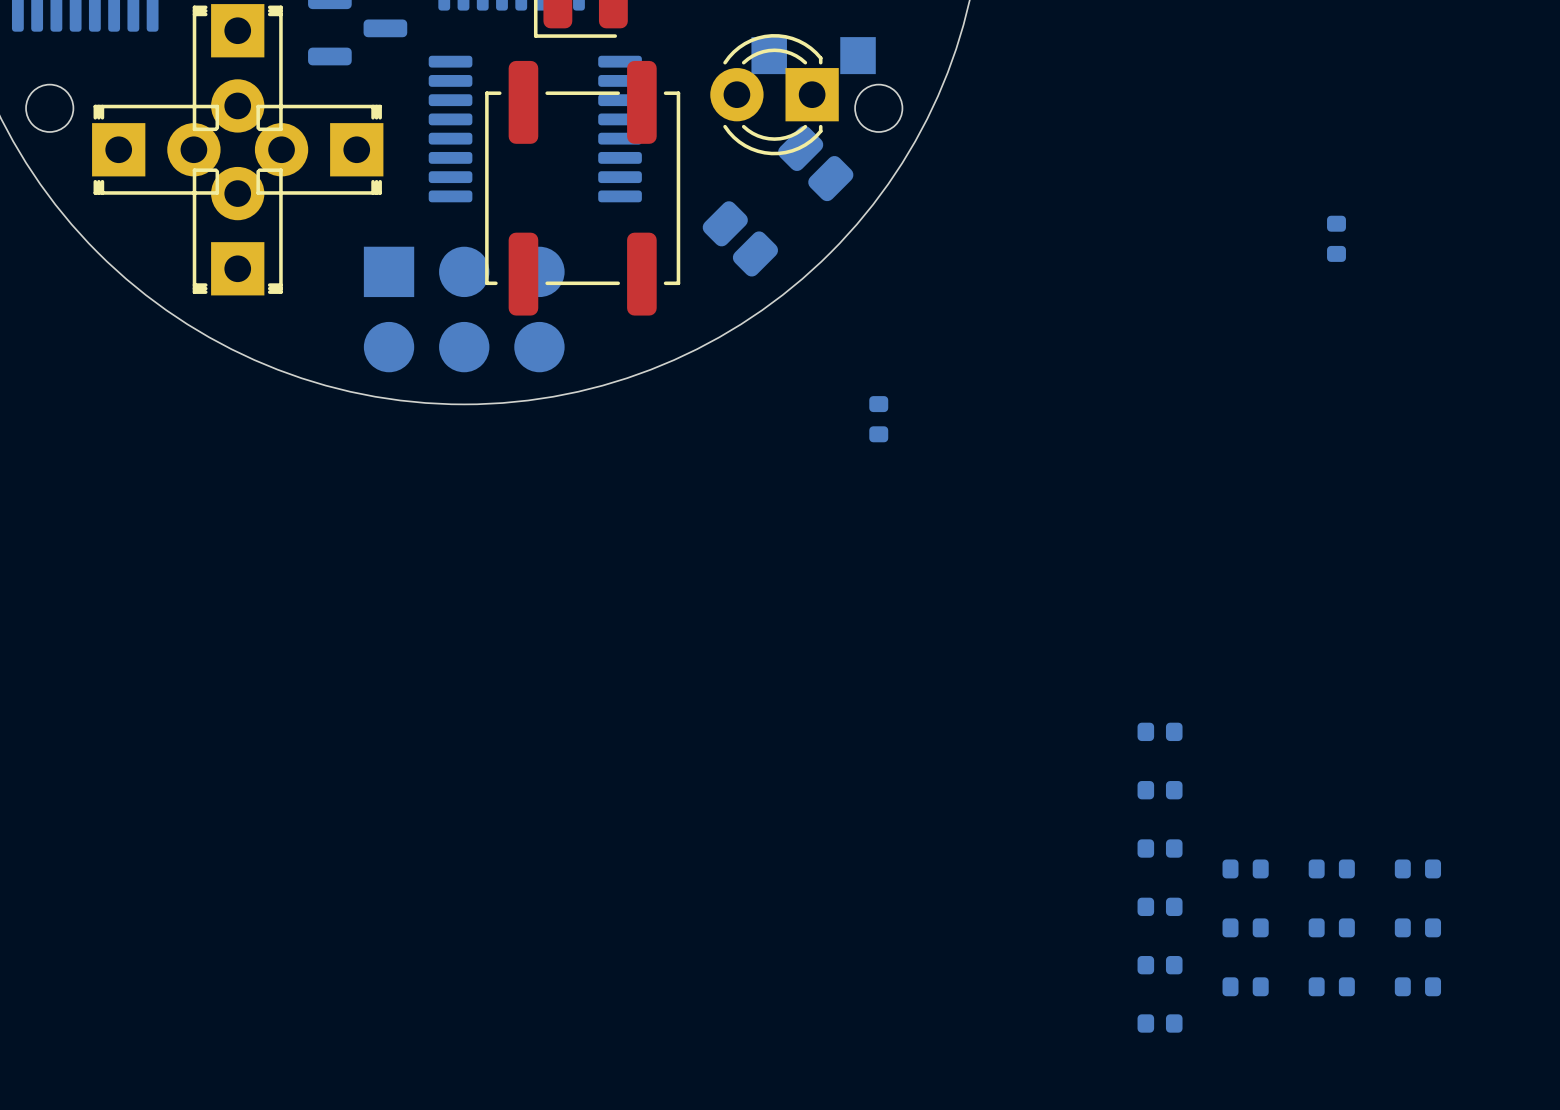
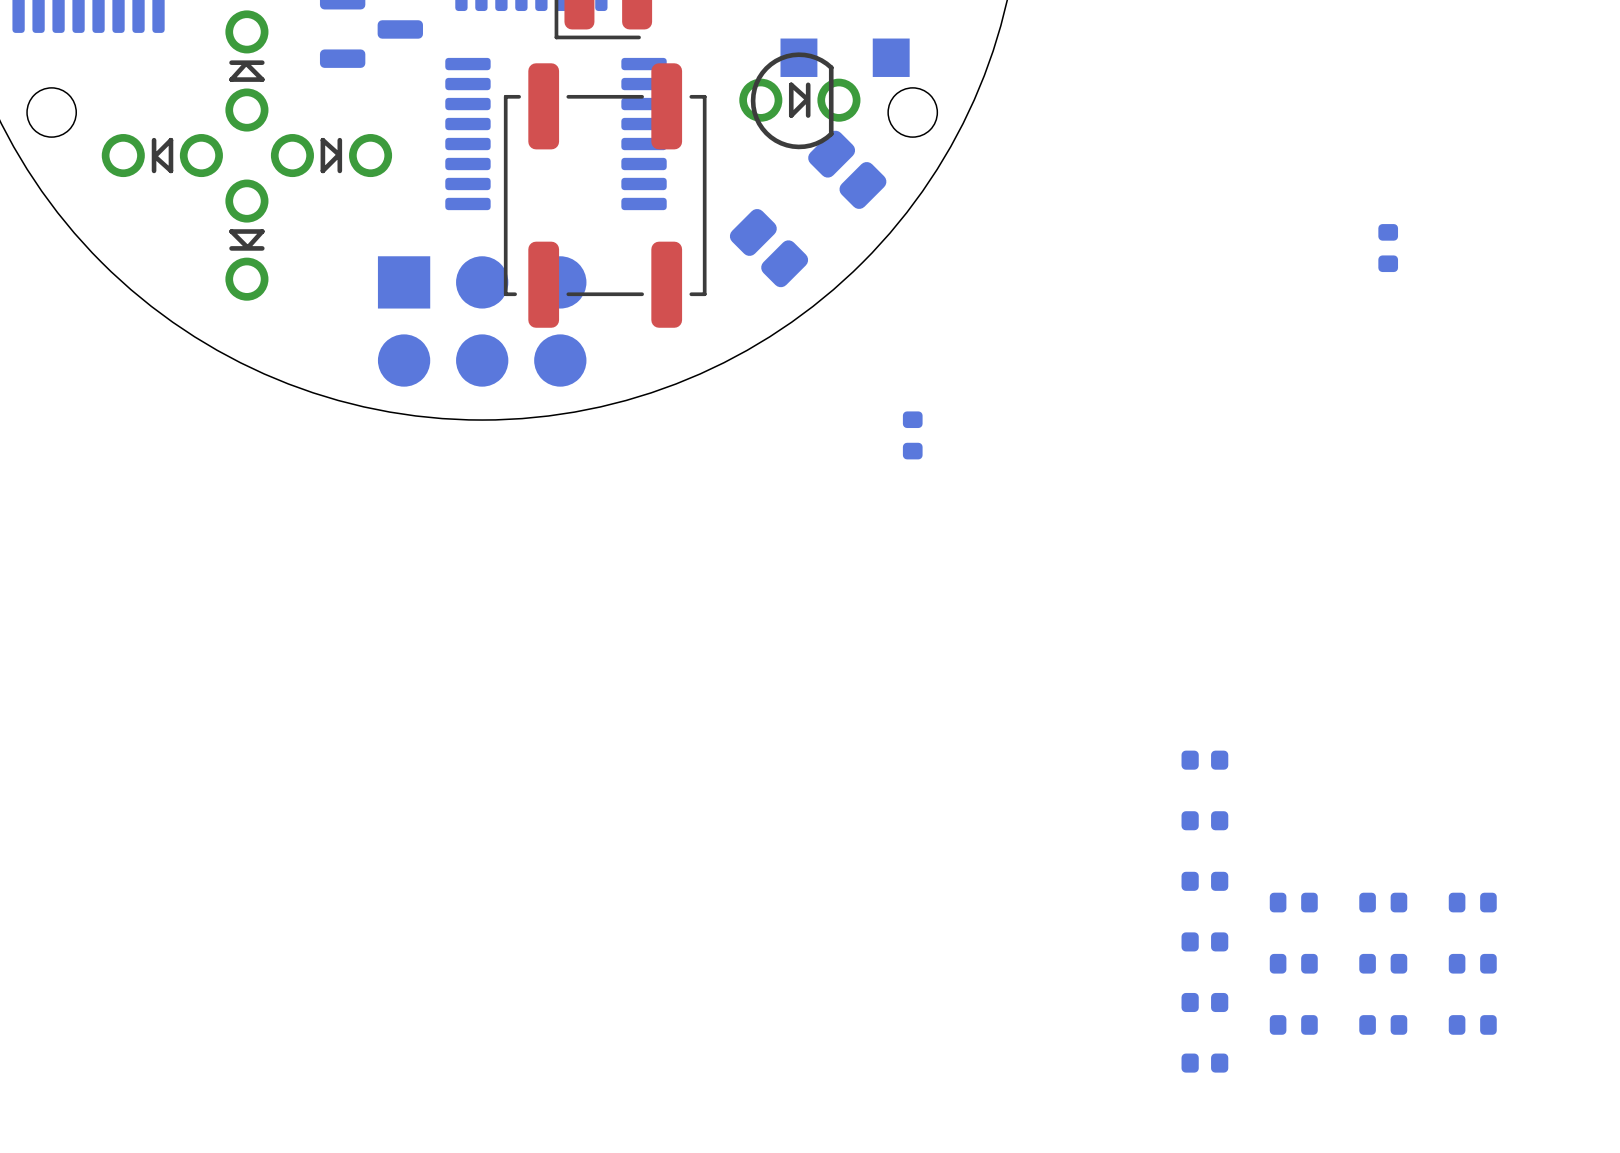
part footprint: [192, 4, 283, 133] -> [225, 10, 269, 132]
part footprint: [710, 34, 839, 156] -> [739, 52, 861, 150]
part footprint: [92, 104, 221, 195] -> [101, 134, 223, 178]
part footprint: [254, 104, 384, 195] -> [270, 134, 393, 178]
part footprint: [192, 166, 283, 296] -> [225, 179, 269, 301]

